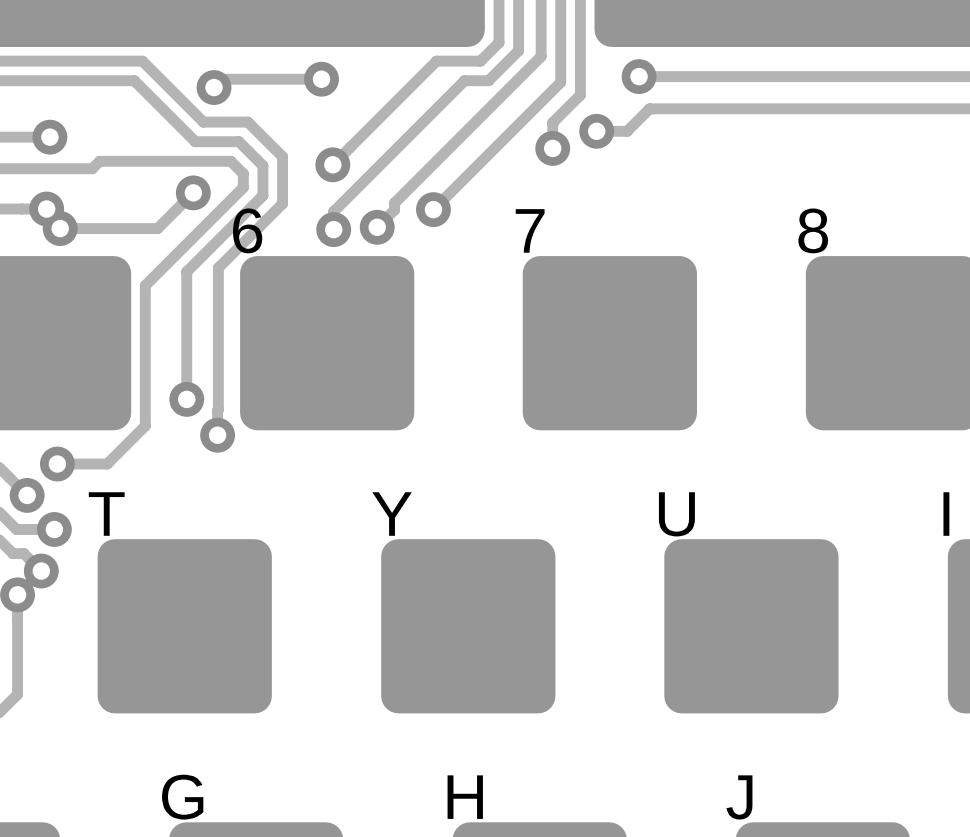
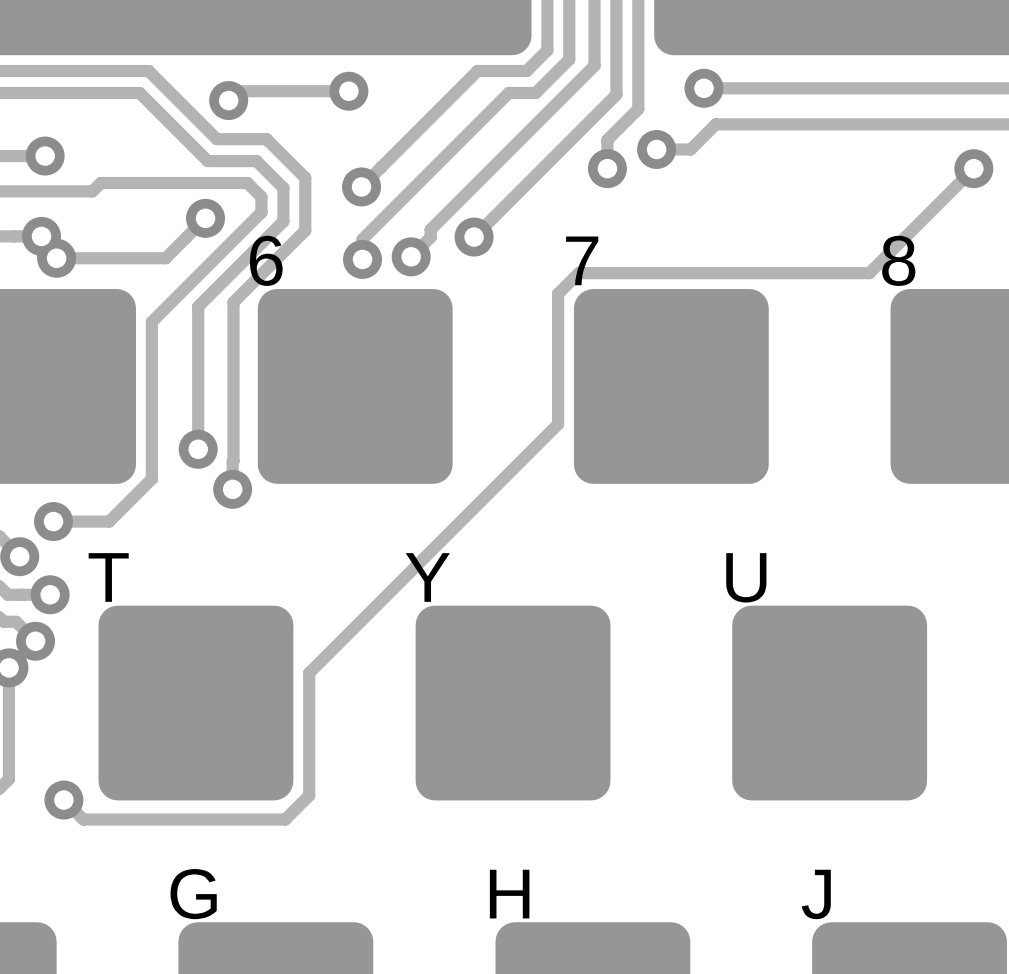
track: none -> (973, 168) (869, 273) (578, 273) (558, 293) (558, 424) (309, 673) (309, 795) (285, 819) (83, 819) (63, 800)
via: none -> (973, 168)
via: none -> (63, 800)

